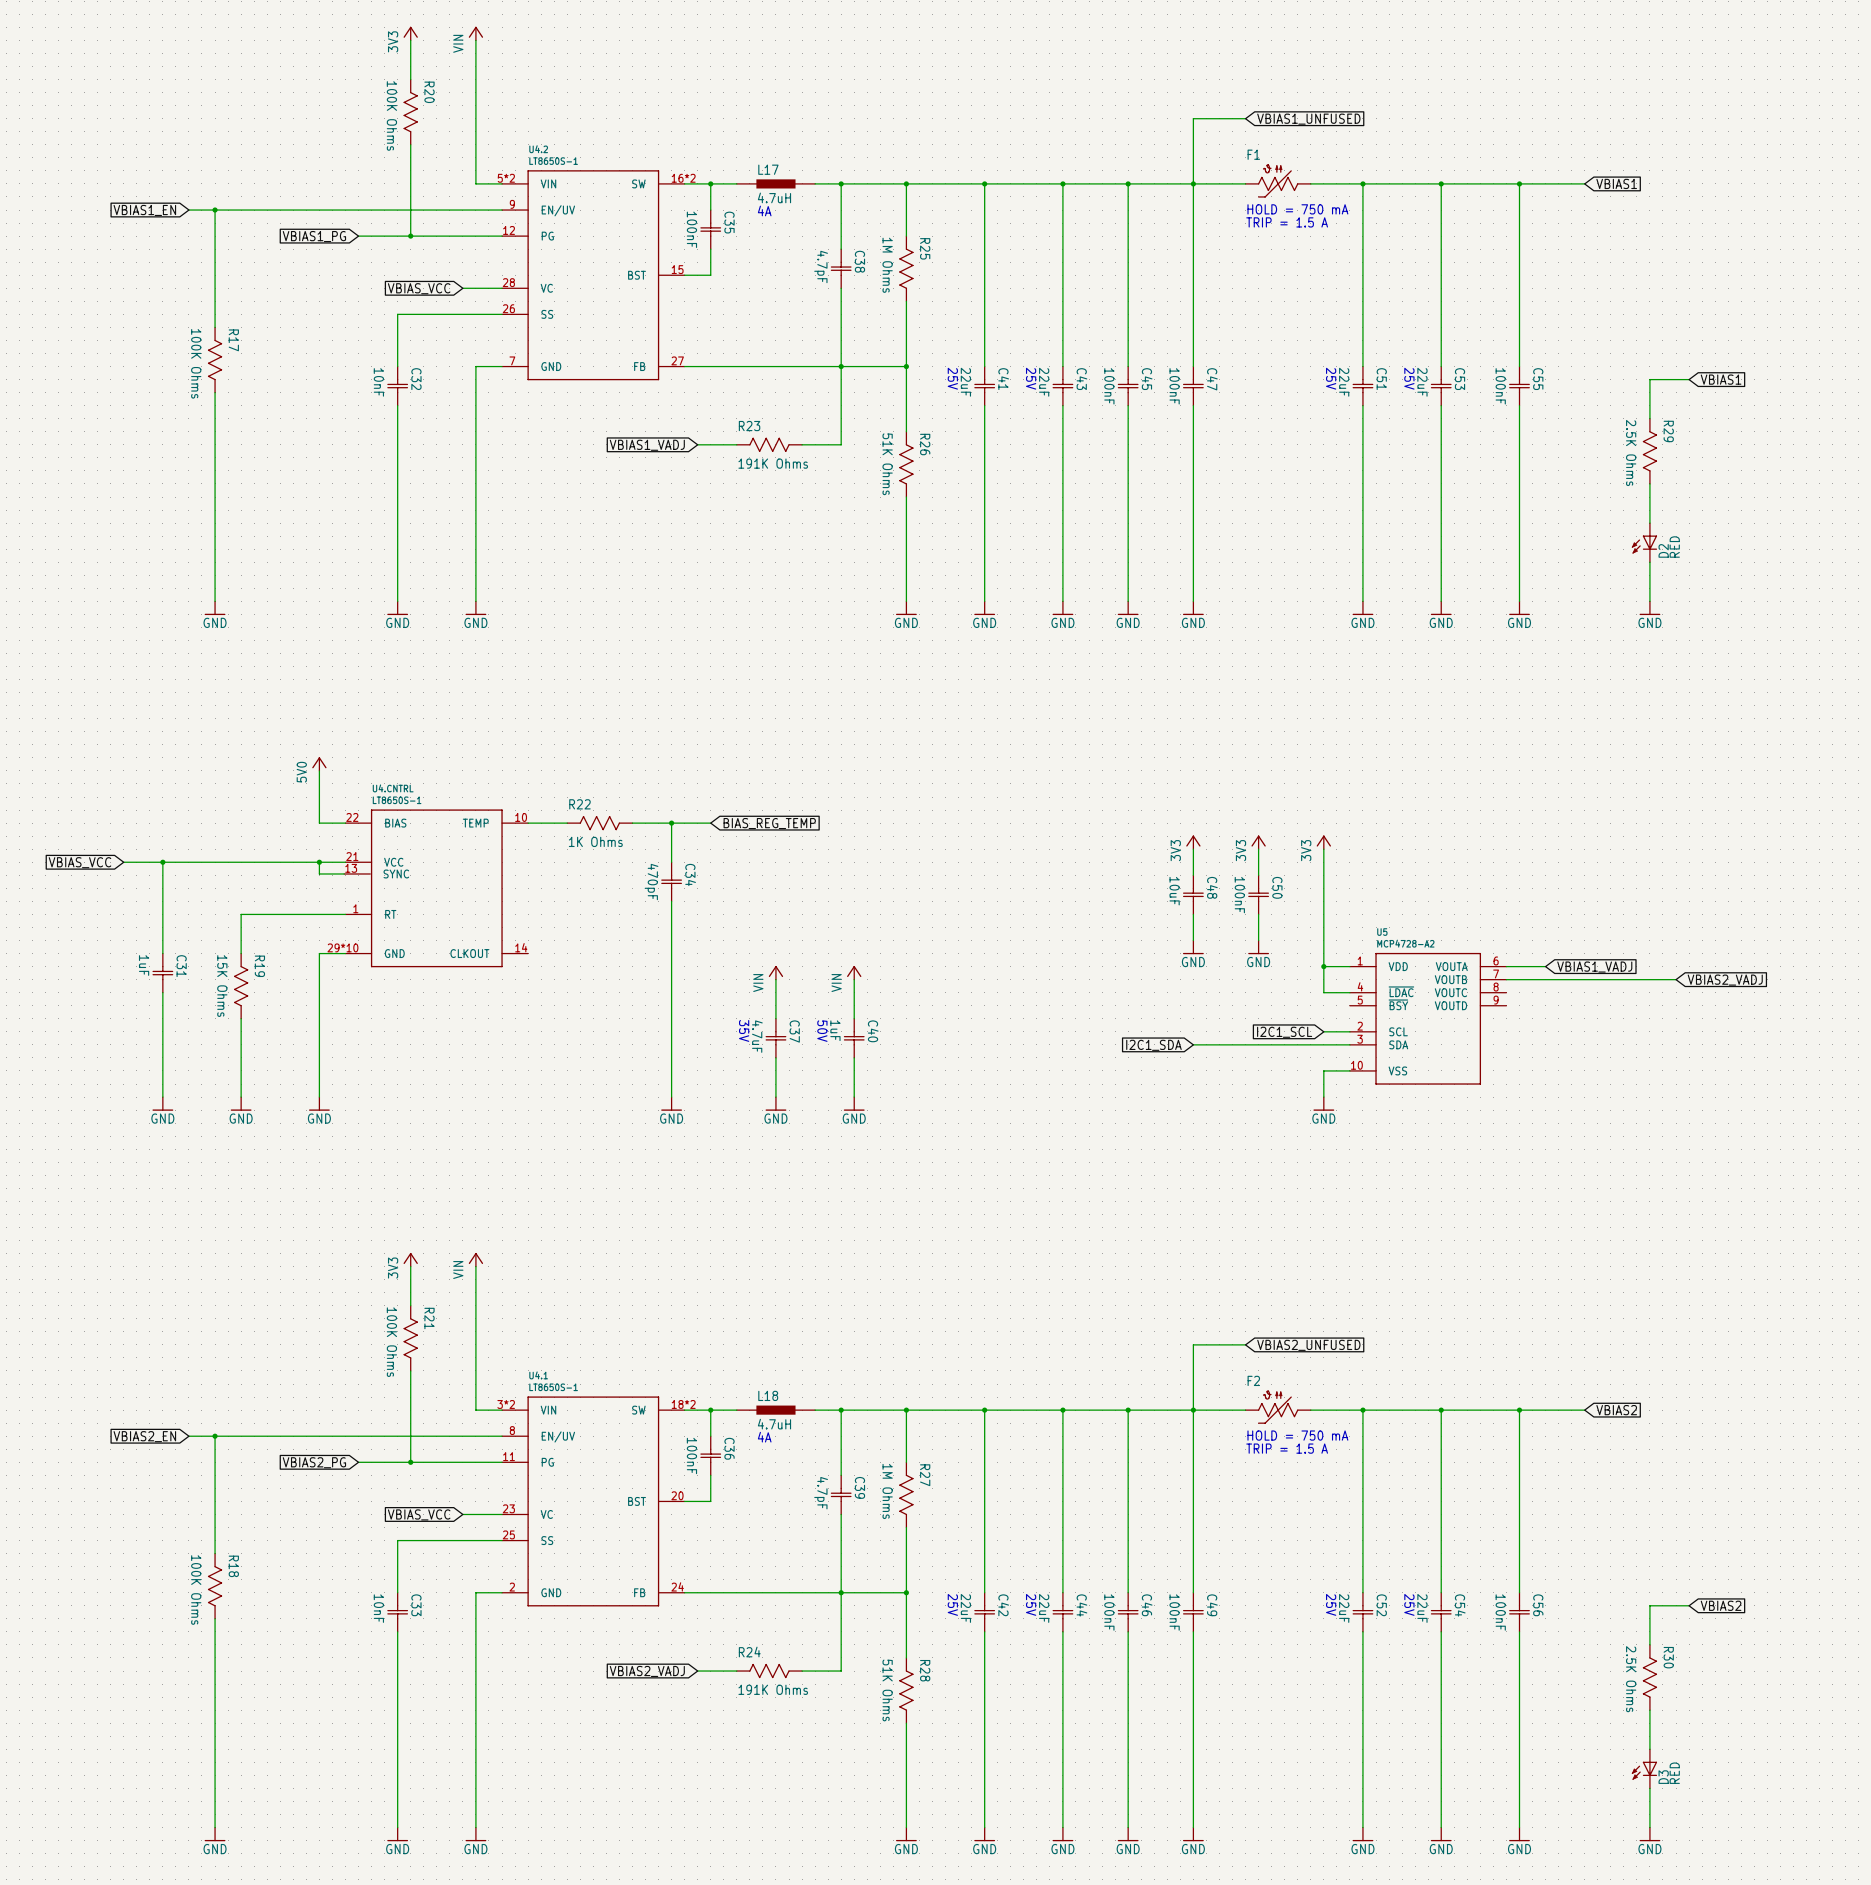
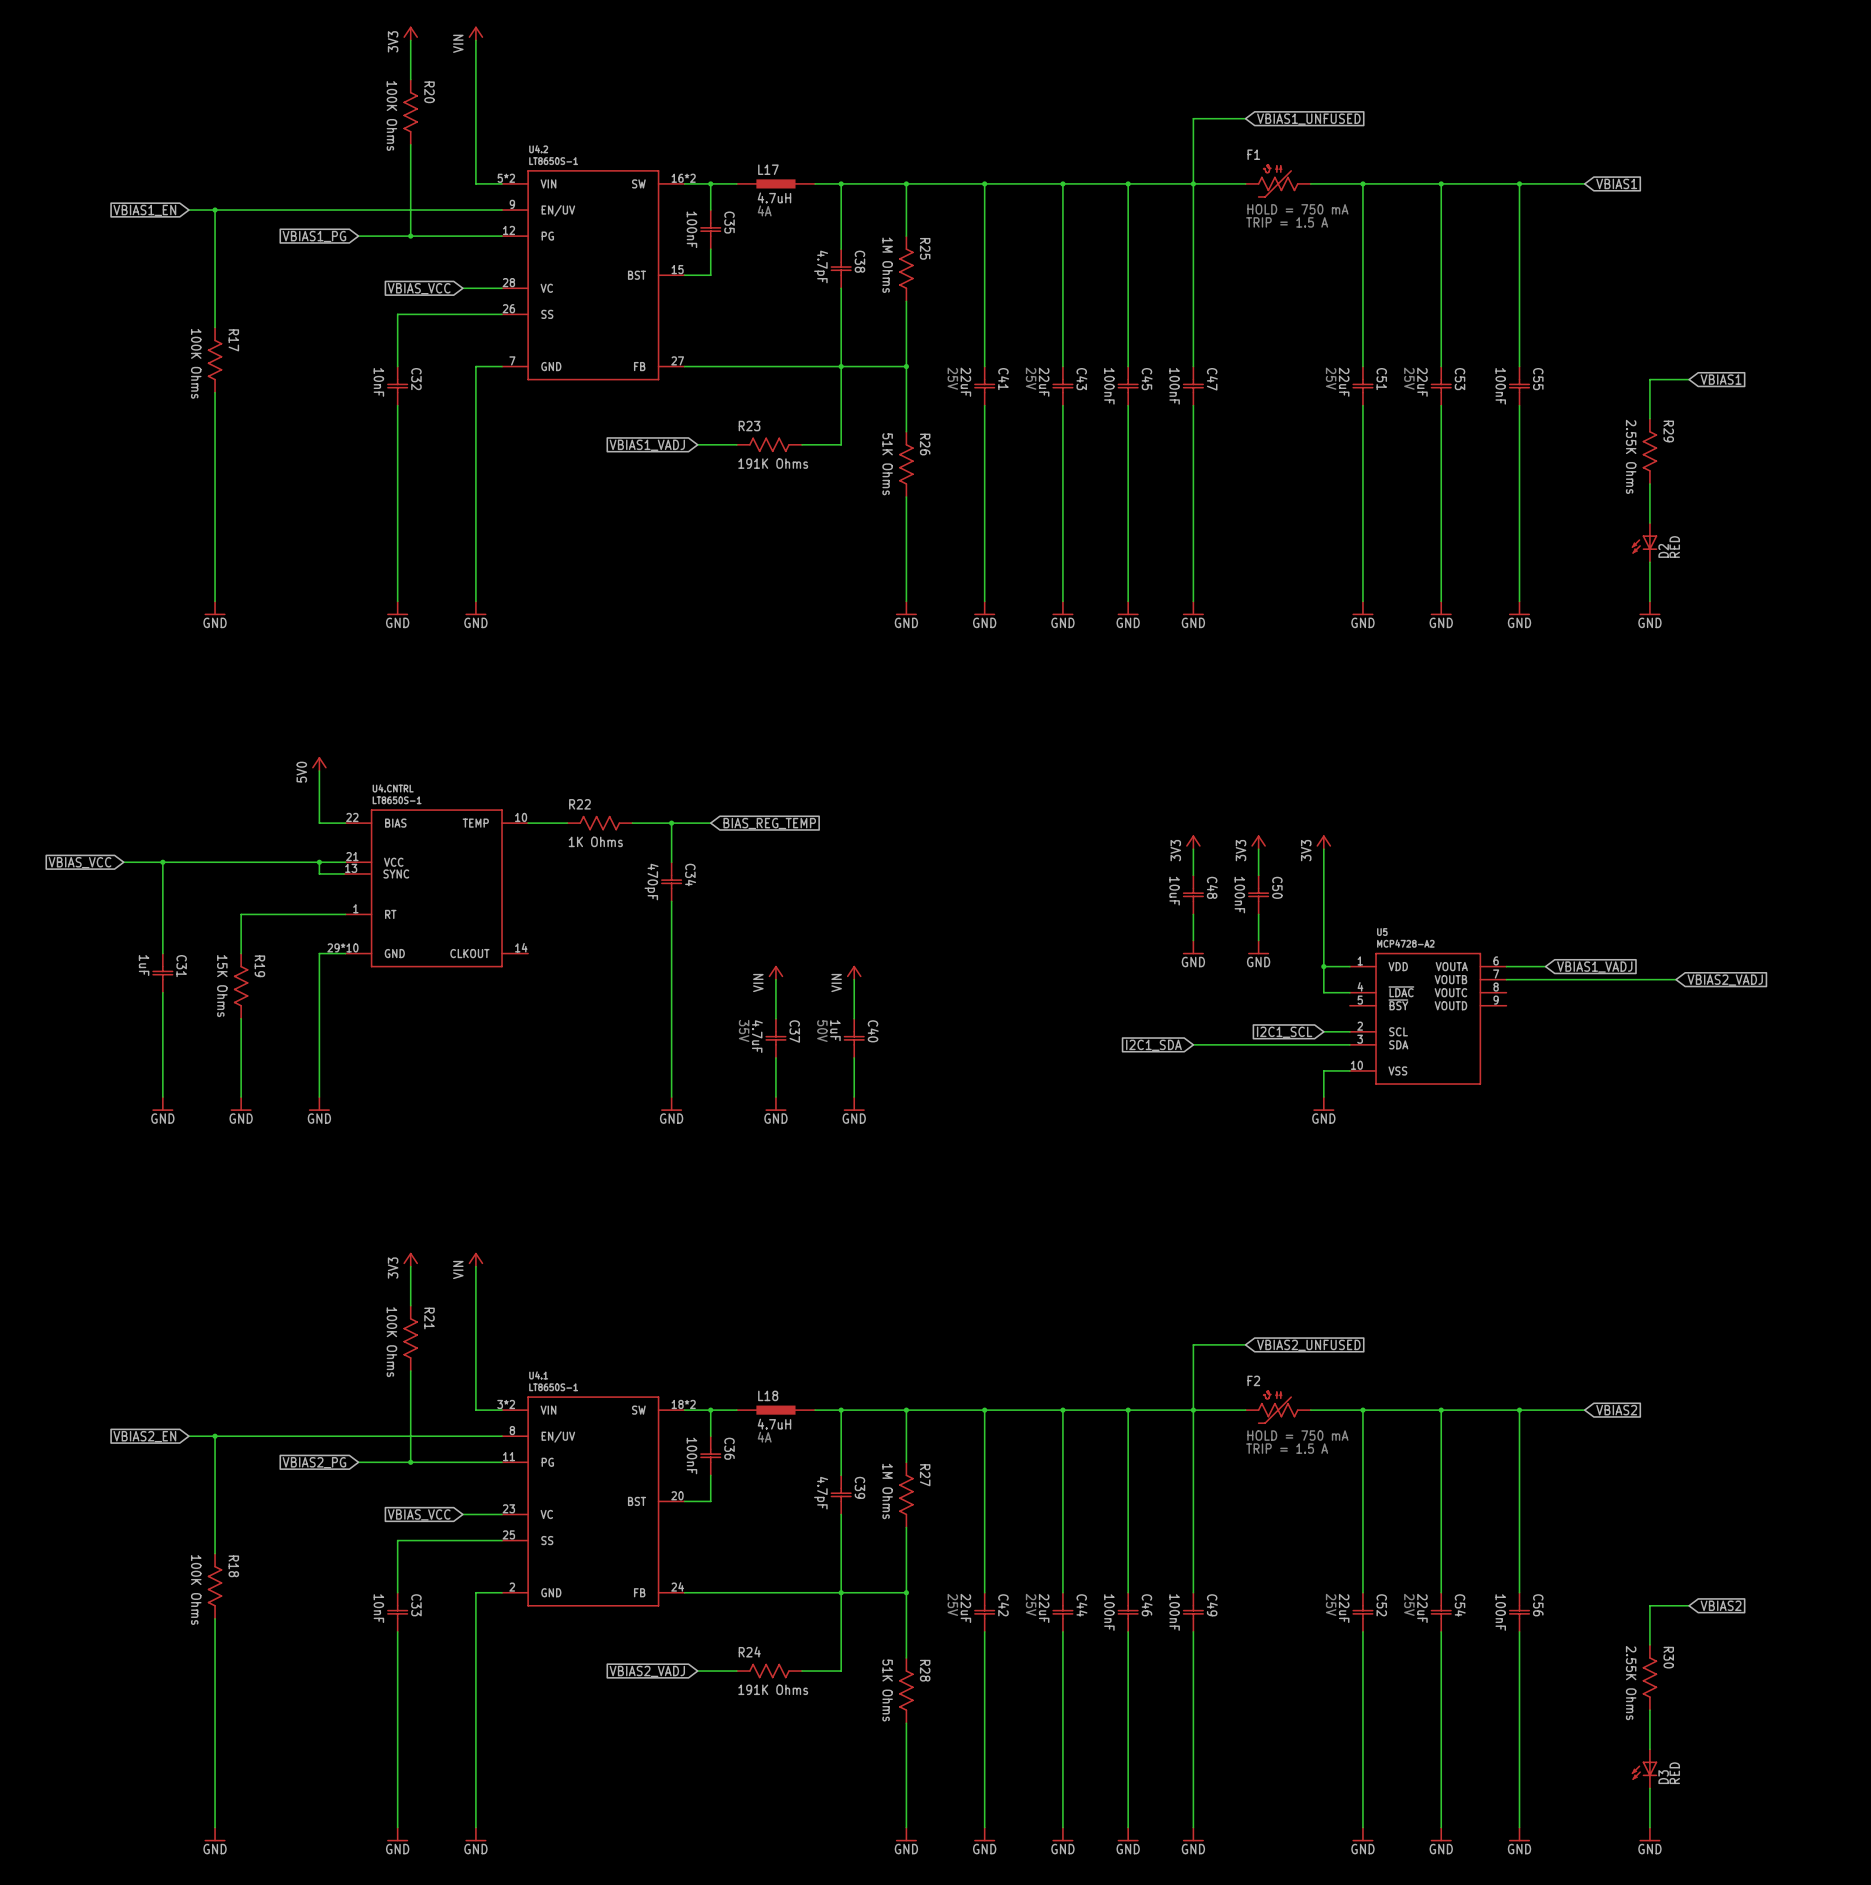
R29 value: 2.5K Ohms (1631, 452) -> 2.55K Ohms (1631, 456)
R30 value: 2.5K Ohms (1631, 1679) -> 2.55K Ohms (1631, 1683)

